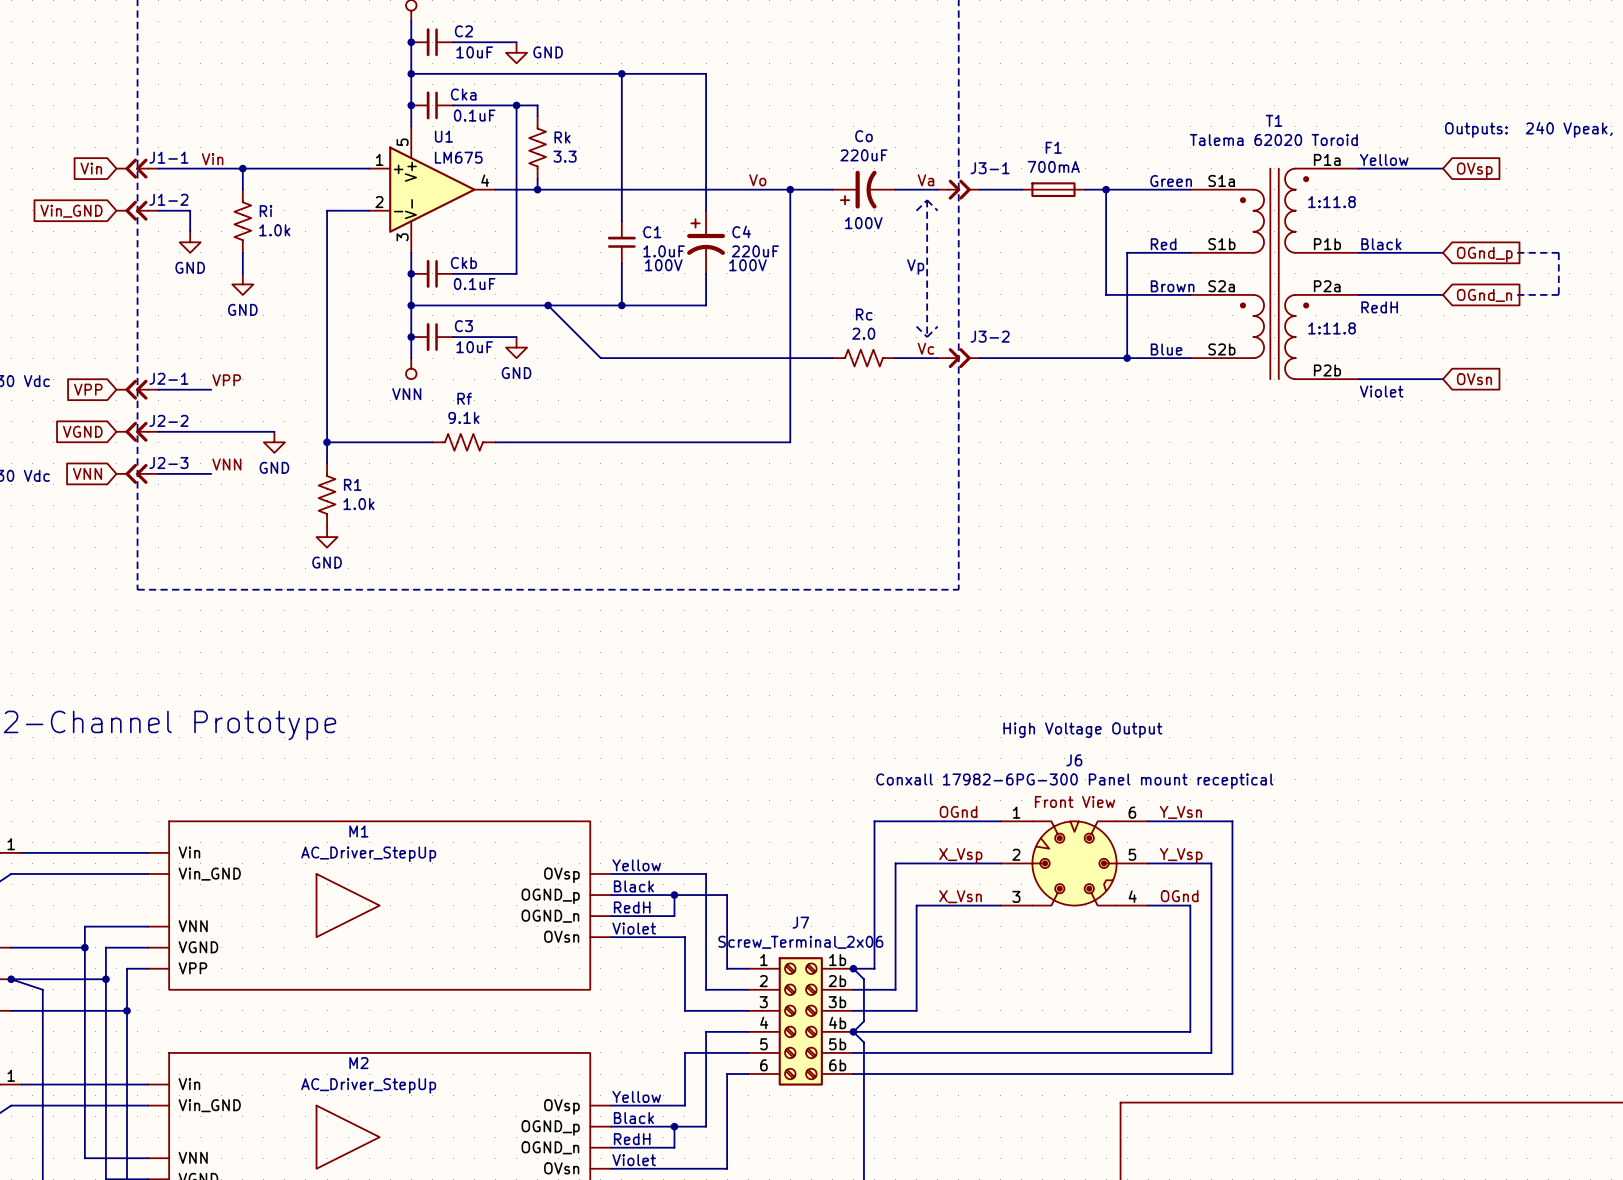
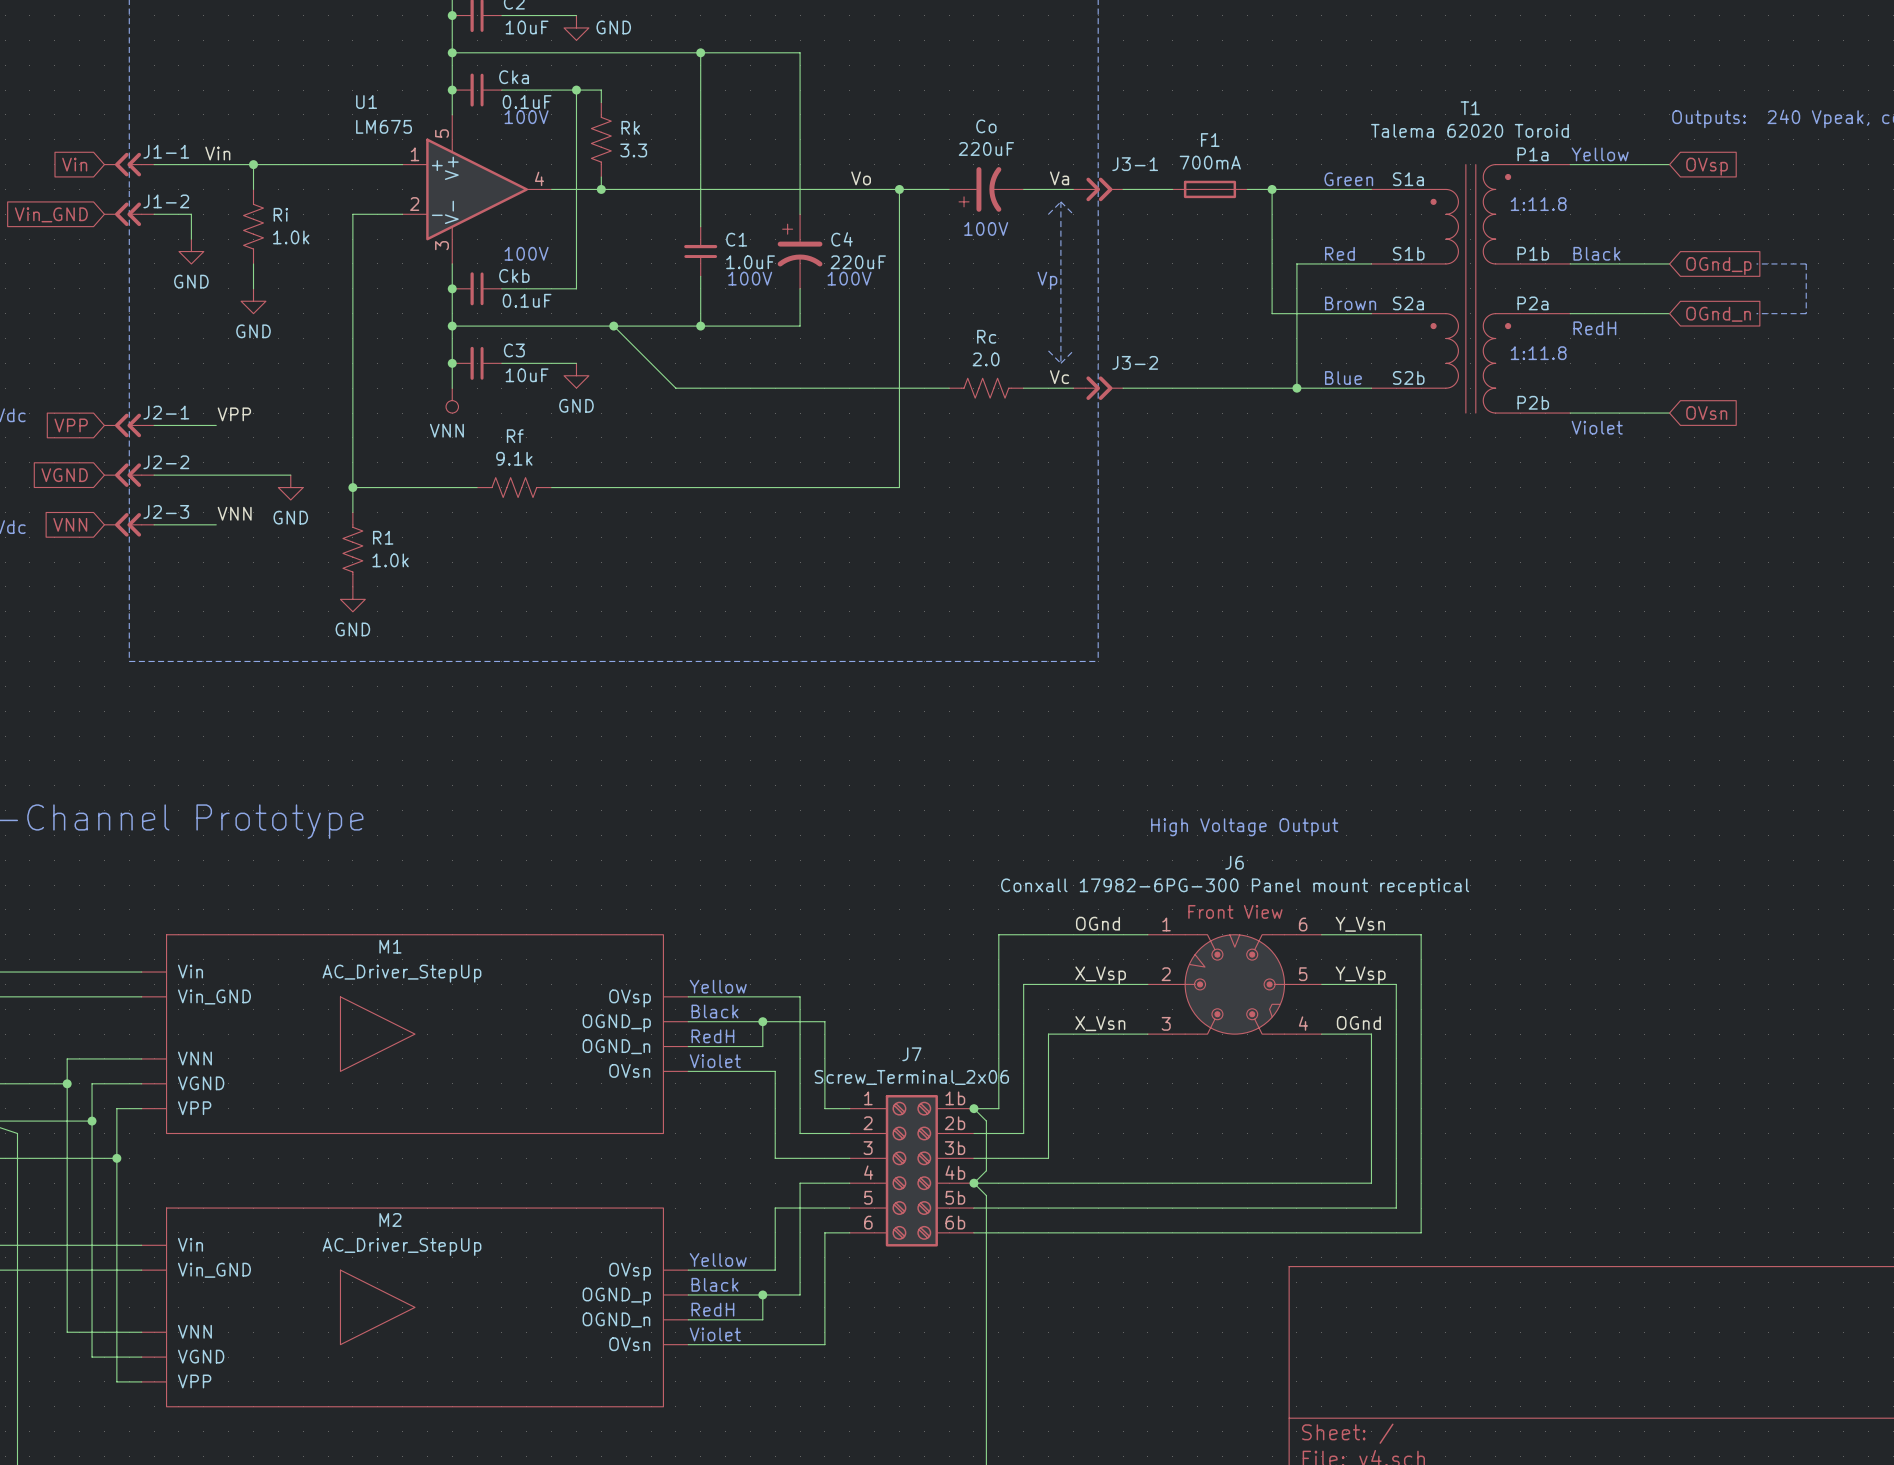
text: none -> 100V (526, 117)
U1 name position: U1 (443, 136) -> U1 (366, 102)
U1 value position: LM675 (458, 157) -> LM675 (384, 126)
text: none -> 100V (526, 253)

